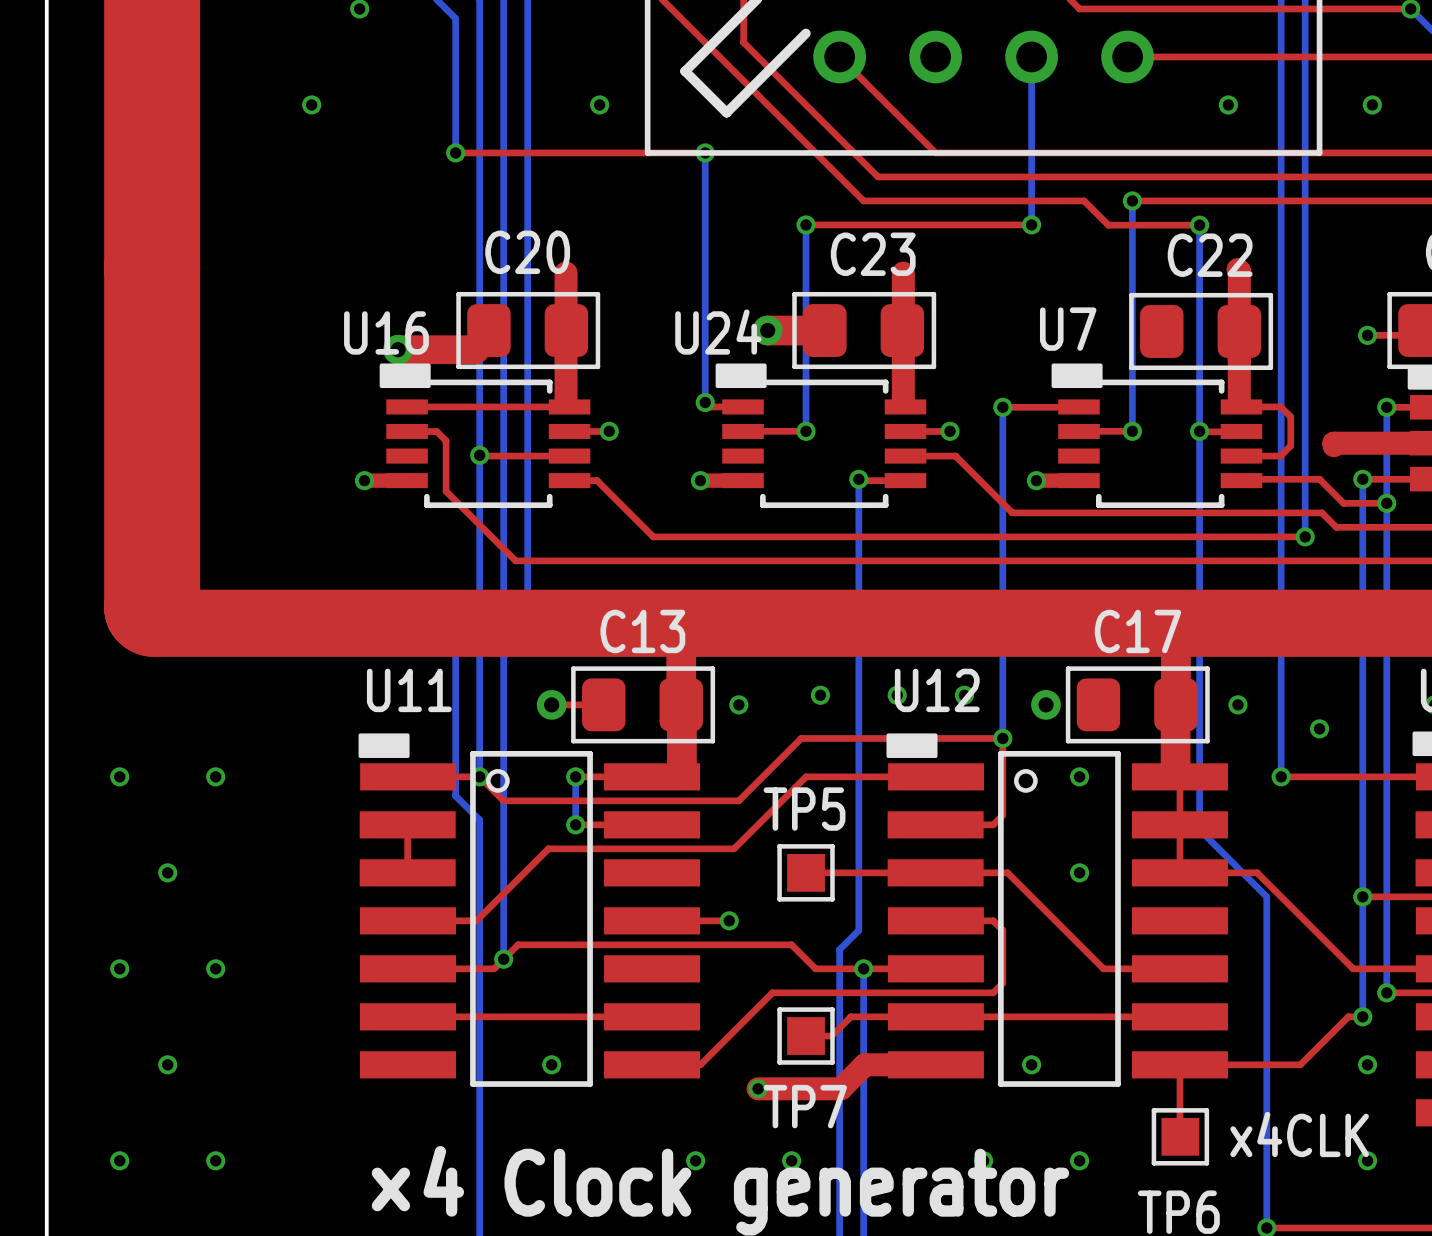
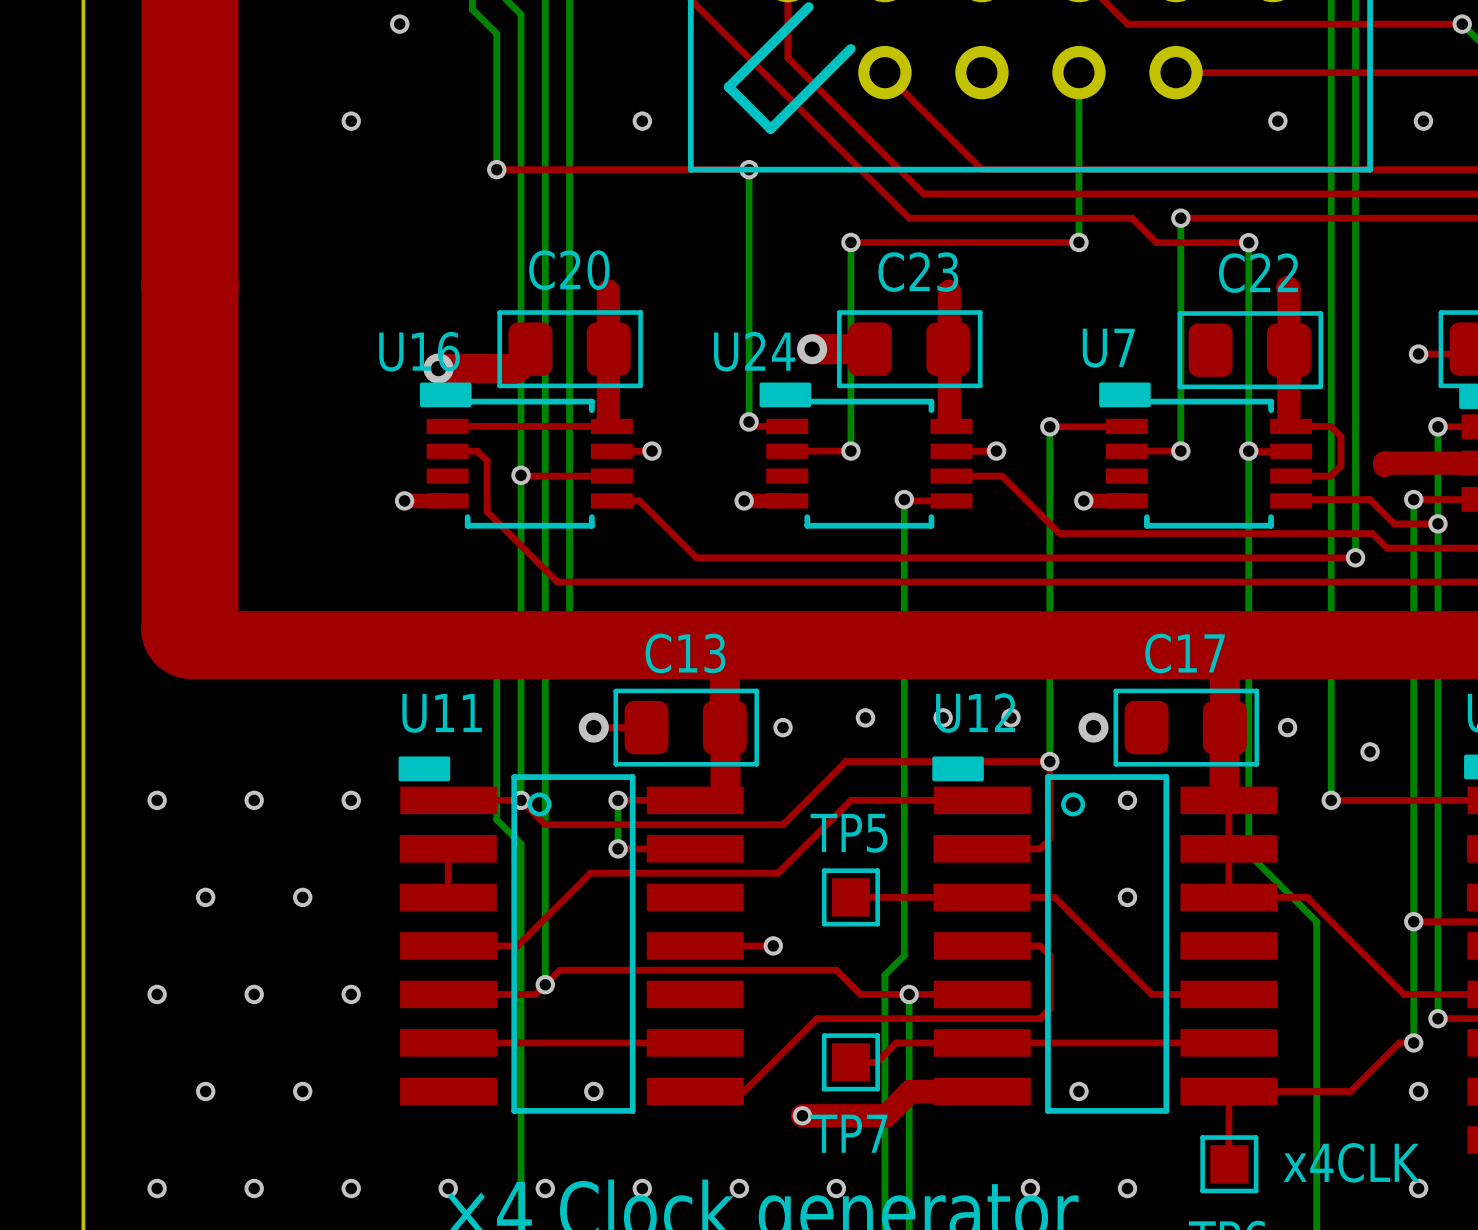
via: none -> (351, 800)
via: none -> (302, 897)
via: none -> (351, 994)
via: none -> (302, 1091)
via: none -> (351, 1188)
via: none -> (448, 1188)
via: none -> (545, 1188)
via: none -> (642, 1188)

